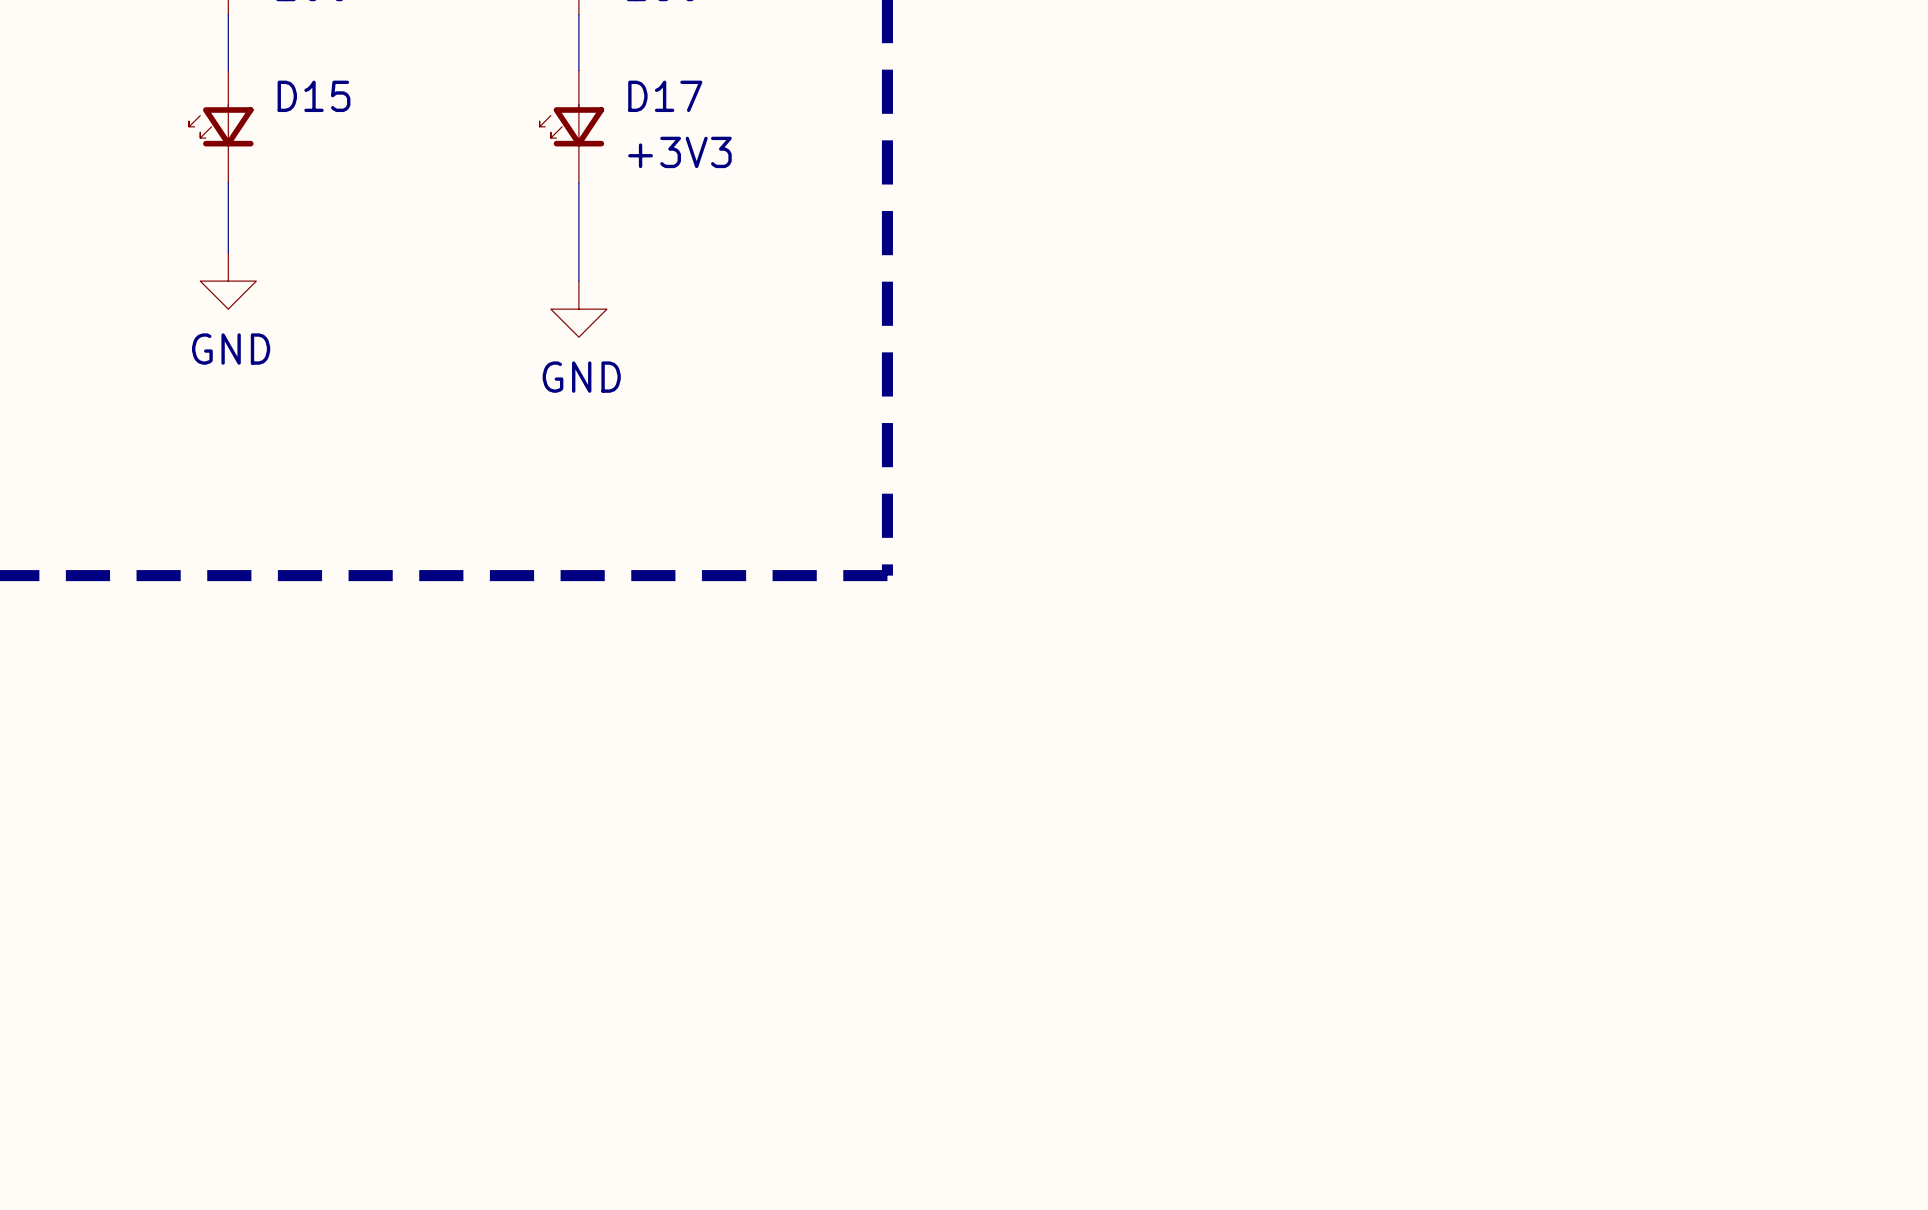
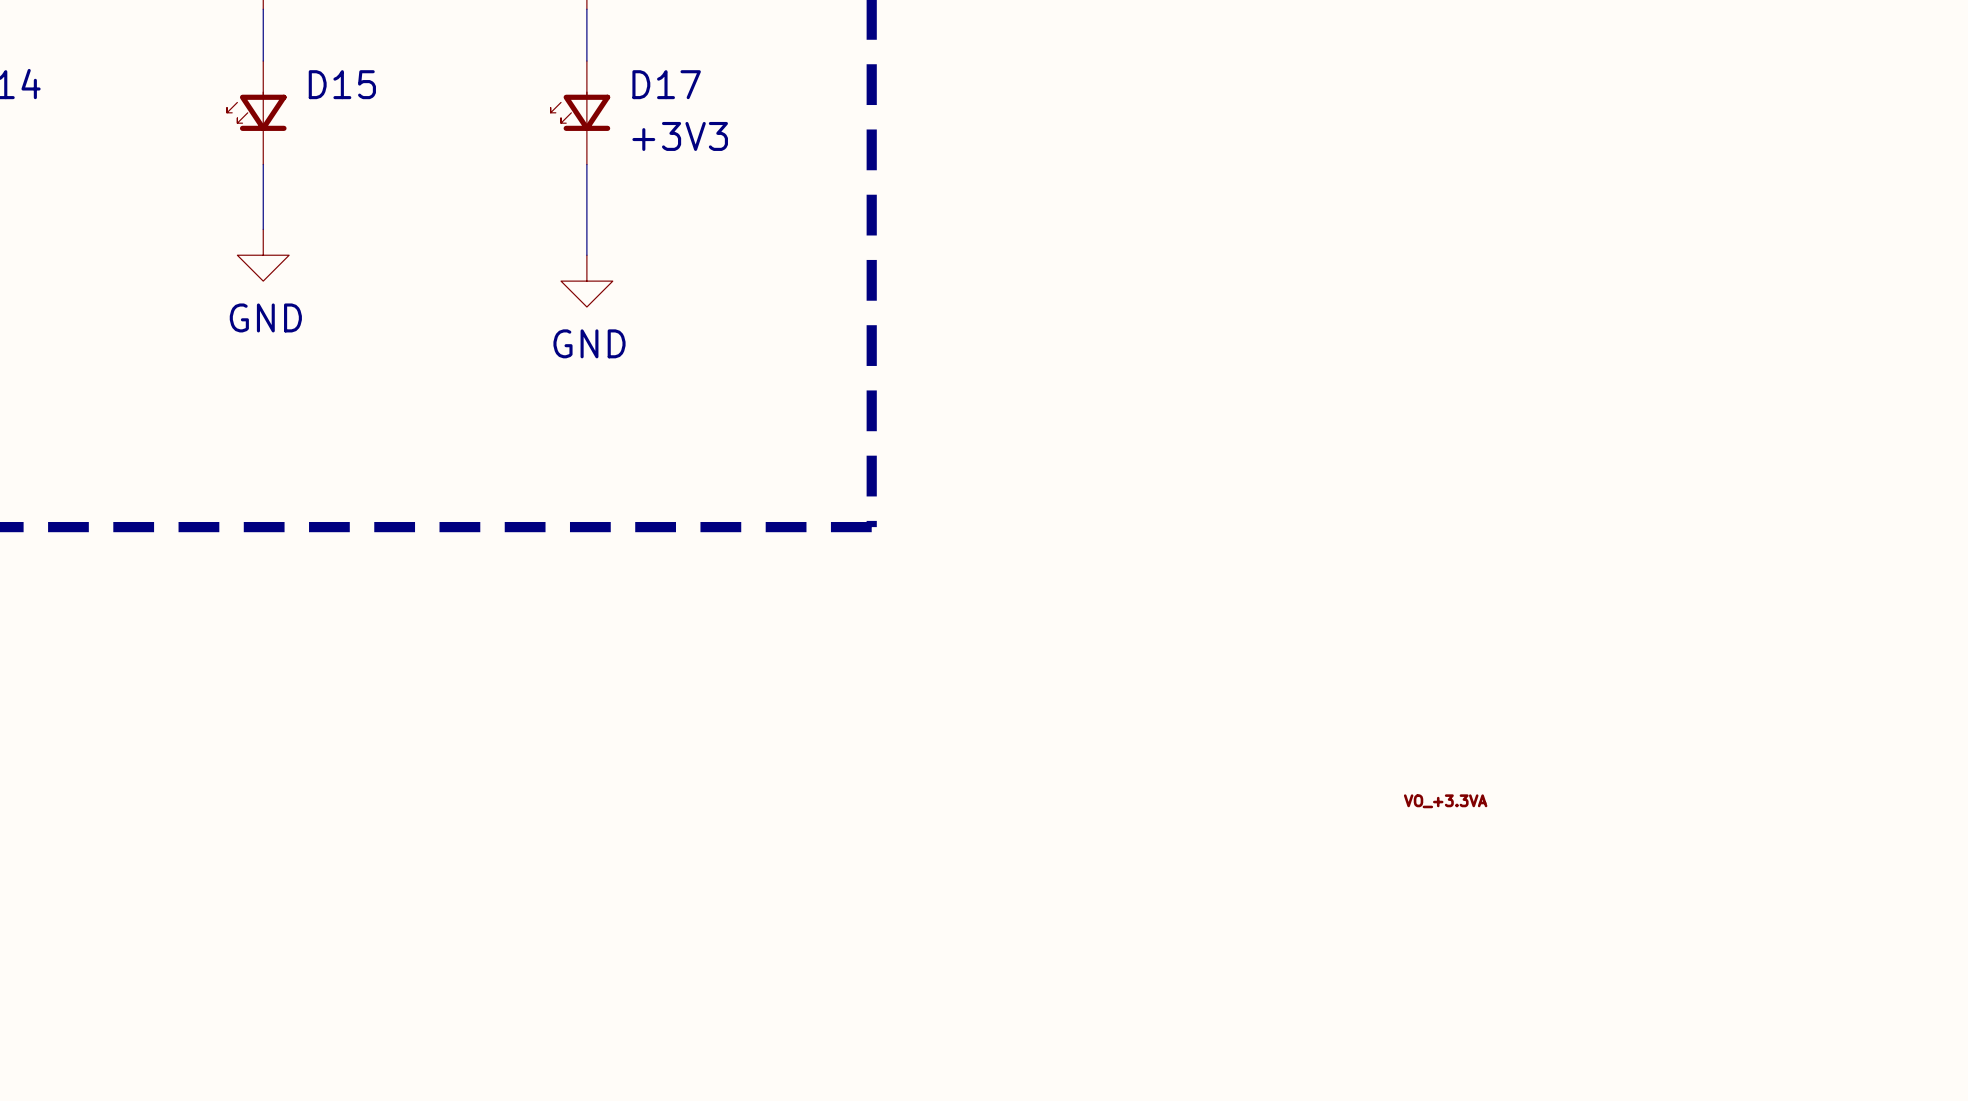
label: none -> VO_+3.3VA (1445, 801)

